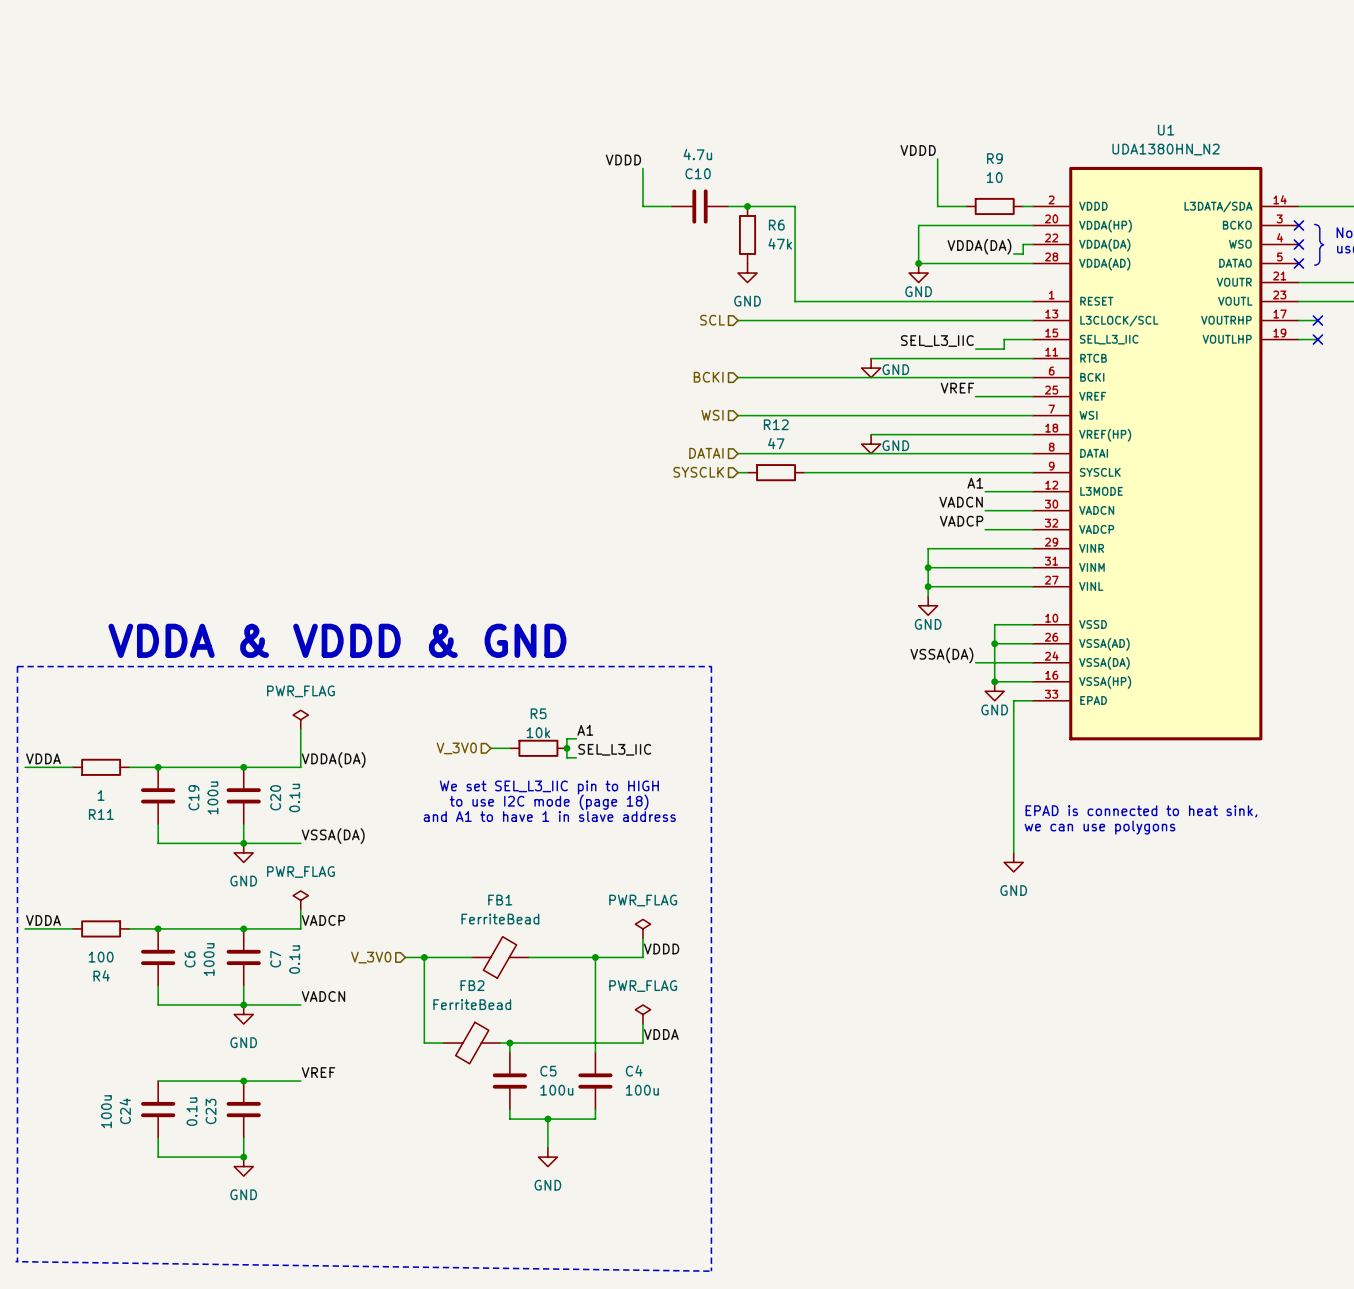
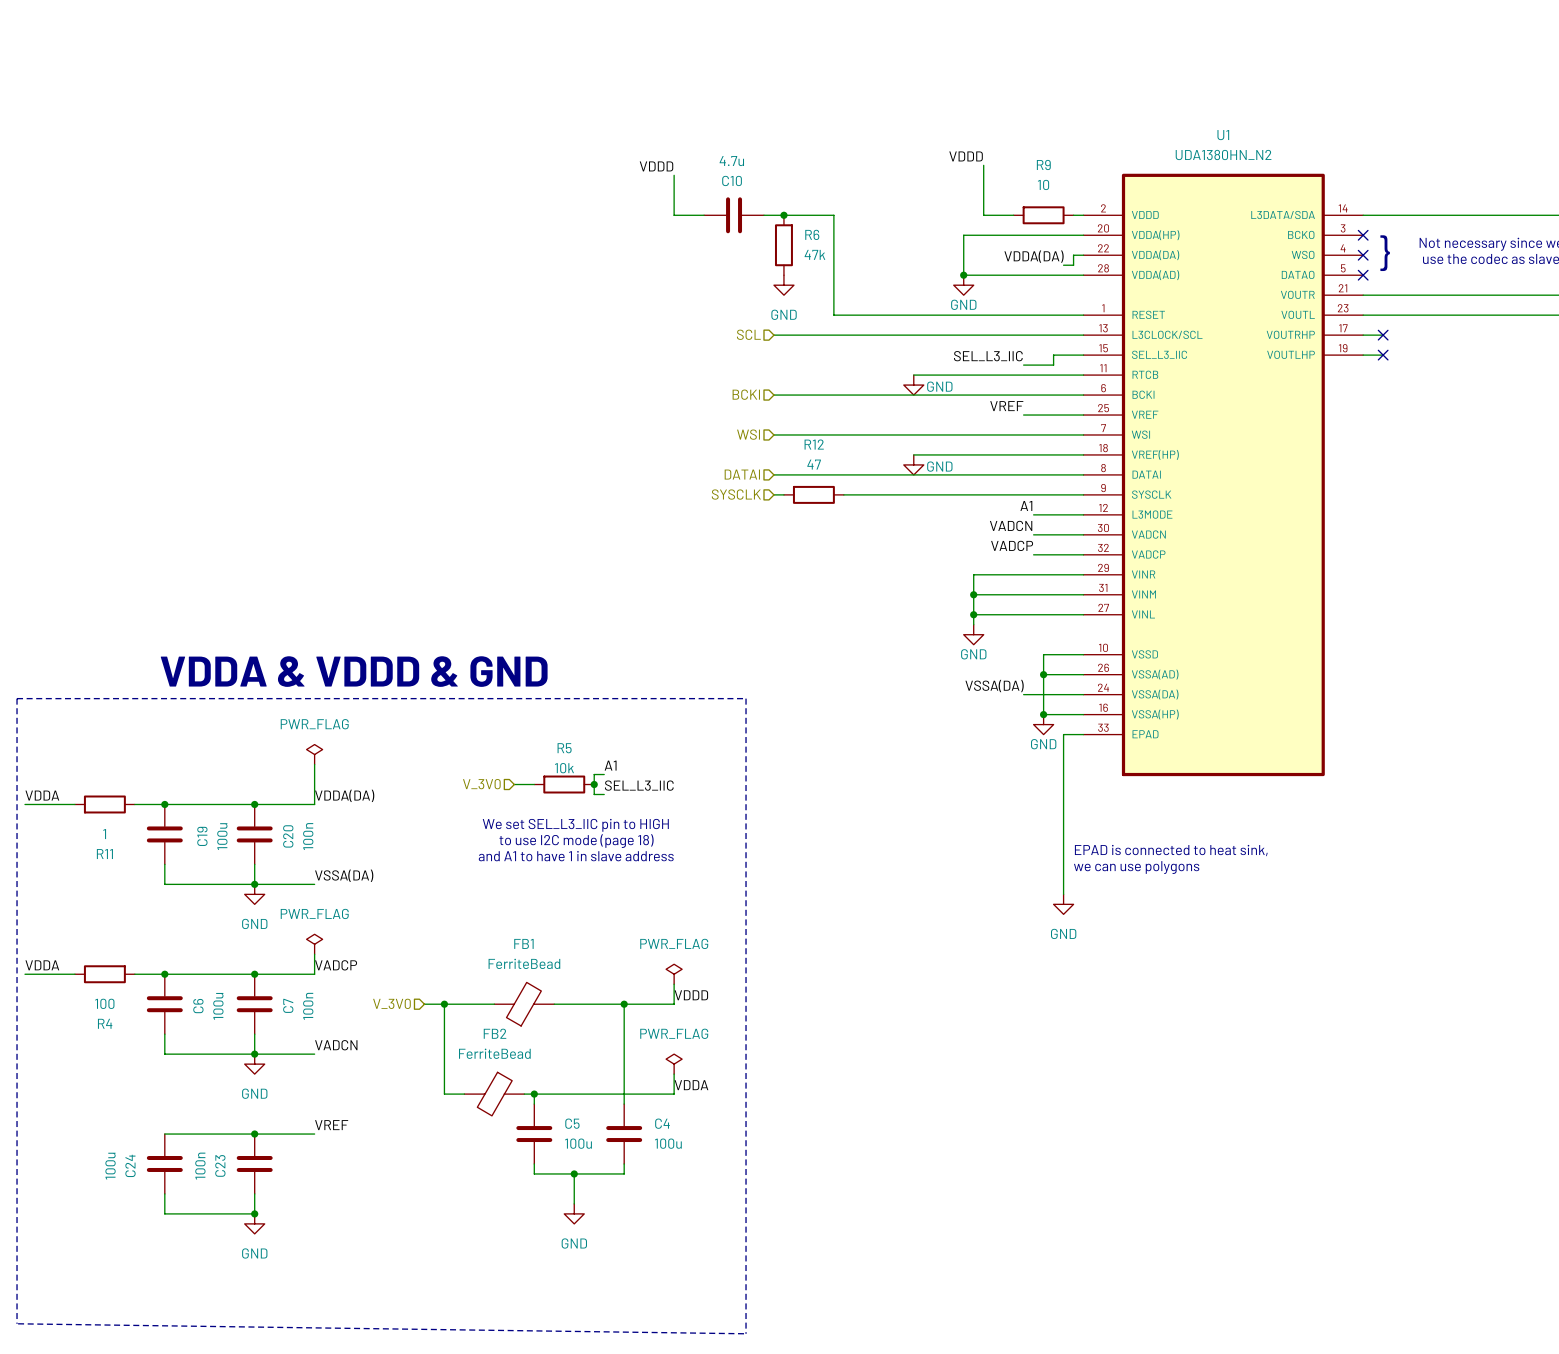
C20 value: 0.1u (294, 797) -> 100n (308, 836)
C7 value: 0.1u (294, 959) -> 100n (308, 1006)
C23 value: 0.1u (192, 1111) -> 100n (200, 1166)

